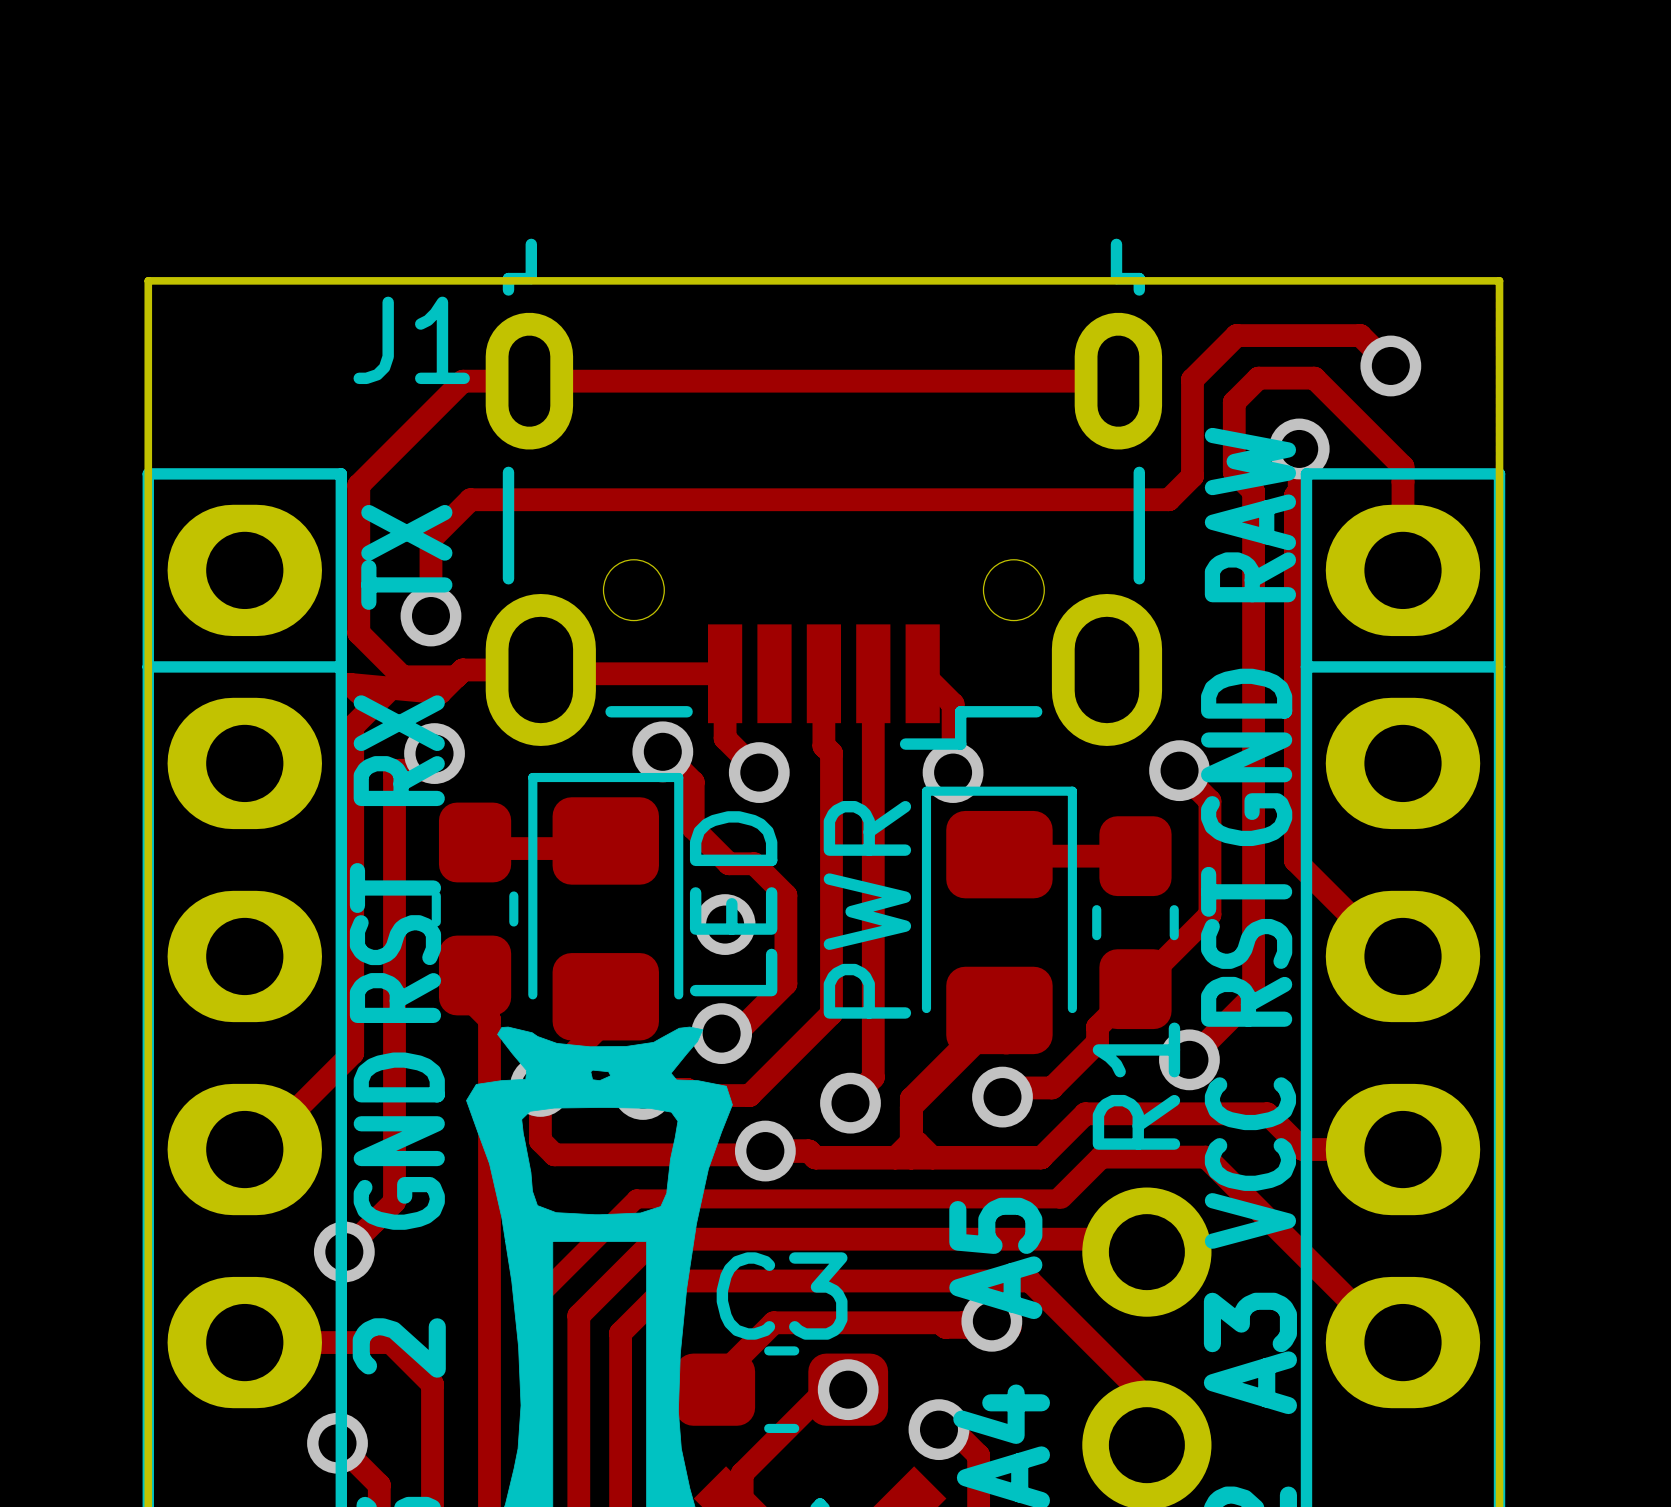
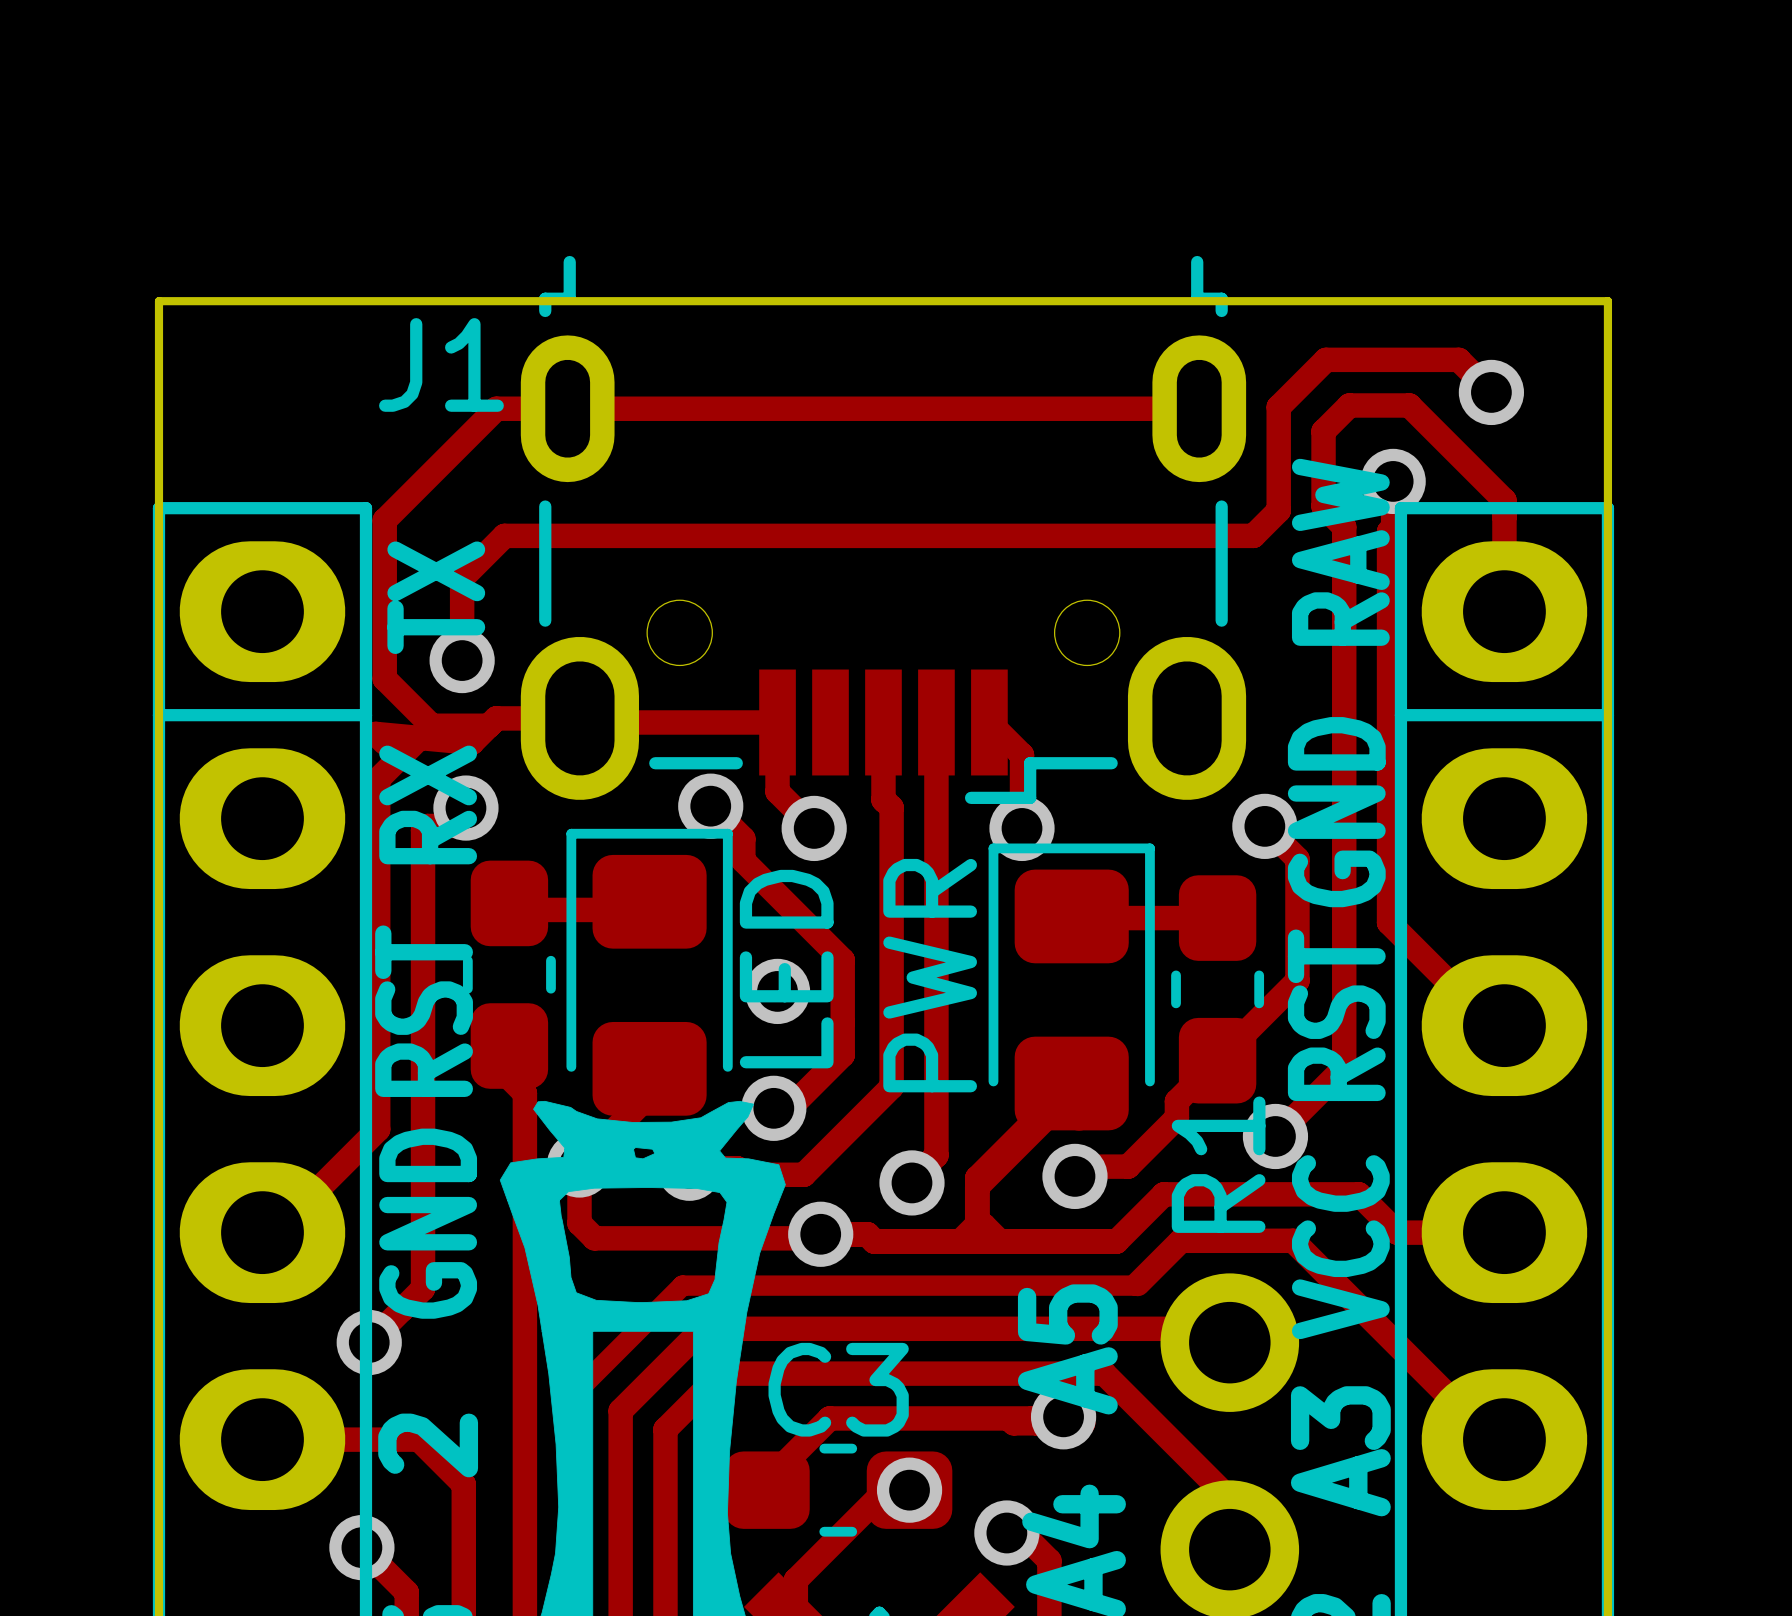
track: (693, 802) (693, 828) (728, 863) (754, 863) -> (743, 860) (808, 926)

